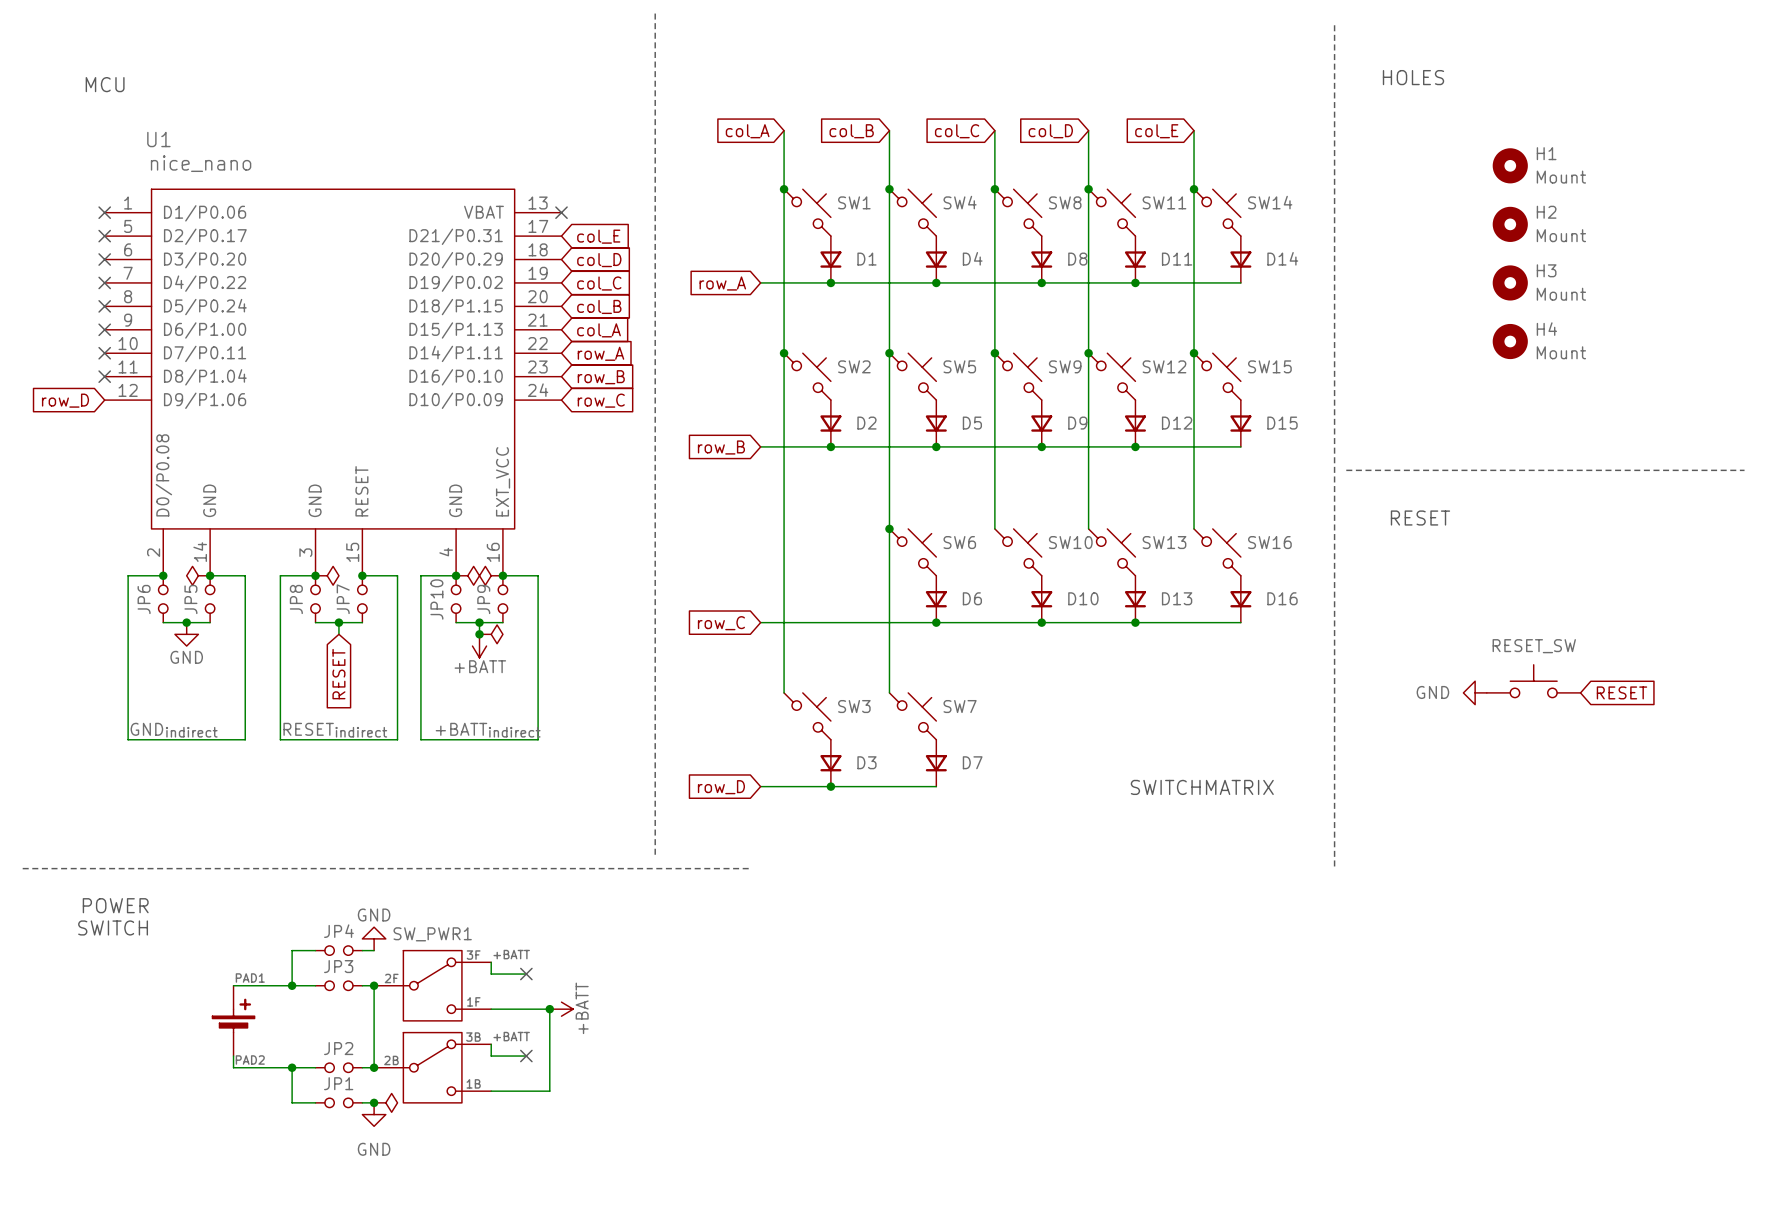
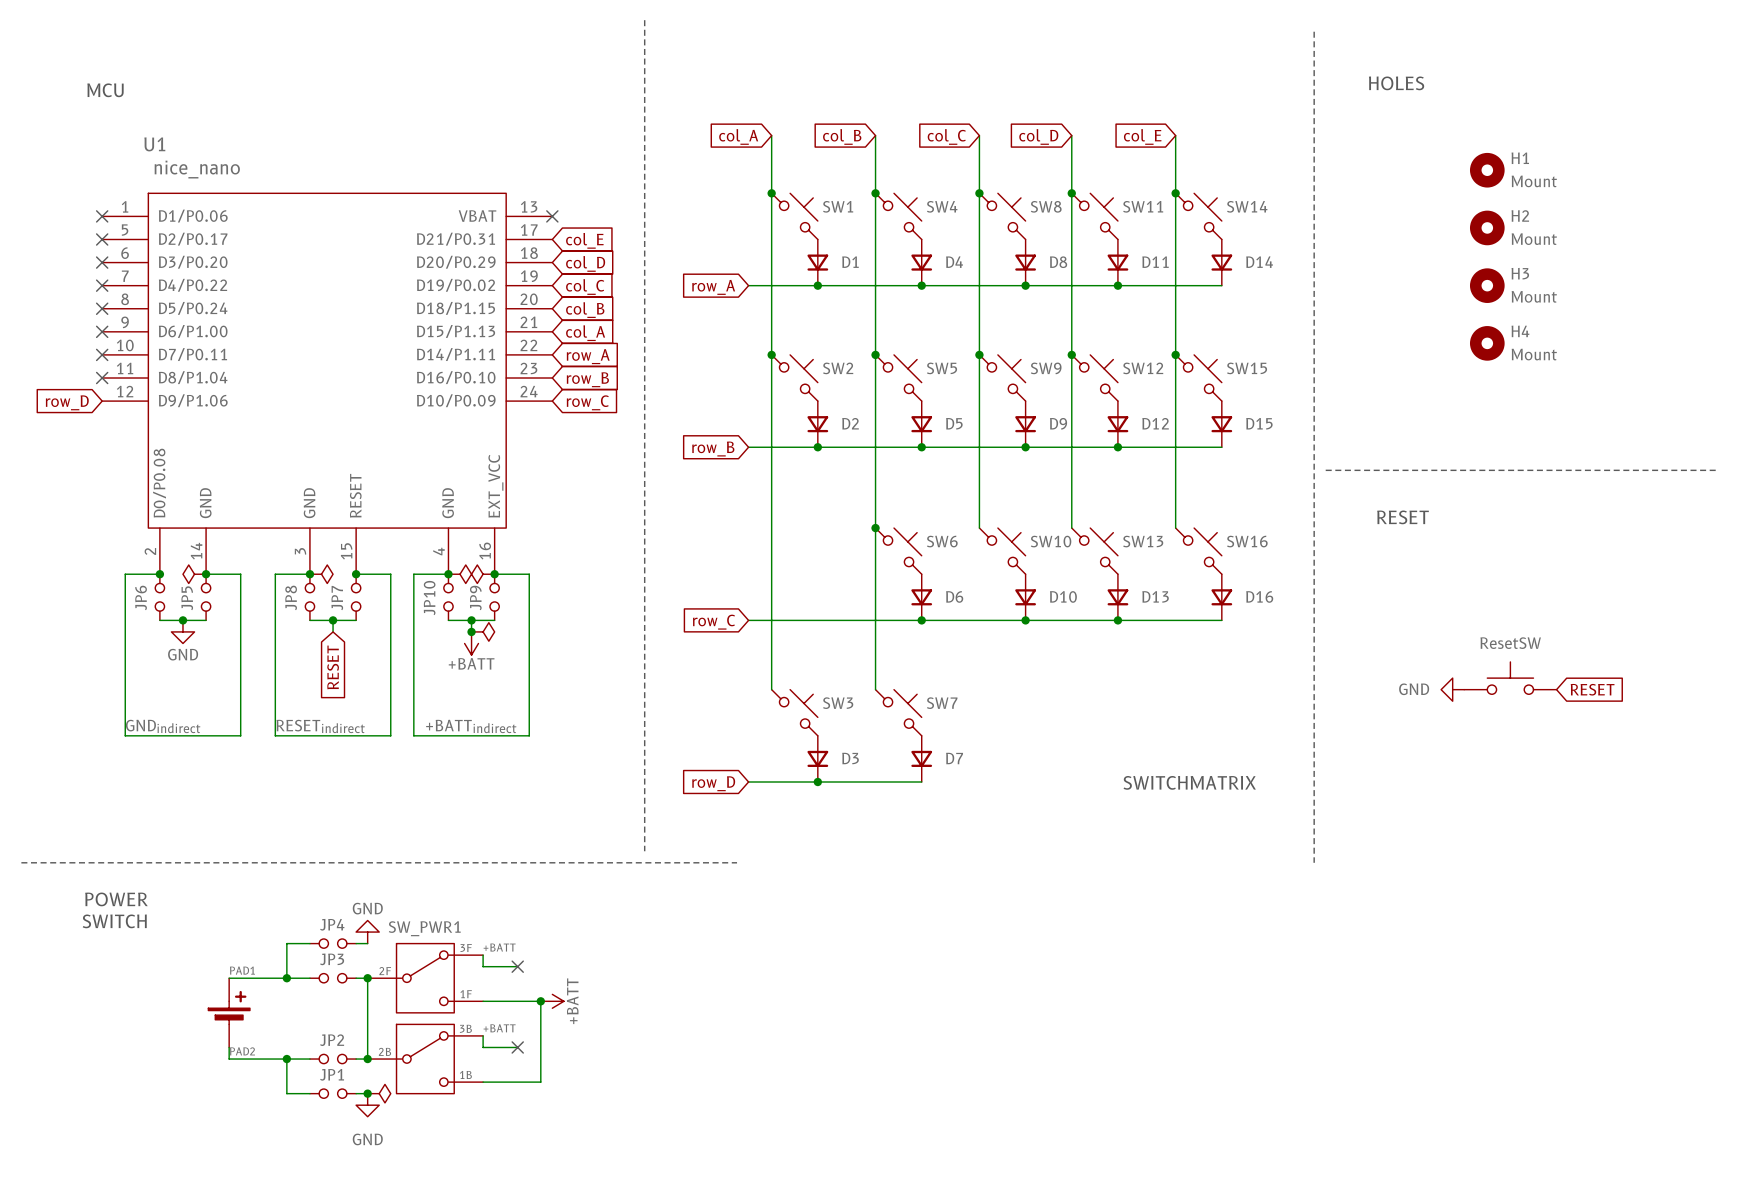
part value: RESET_SW (1534, 646) -> ResetSW (1510, 643)

